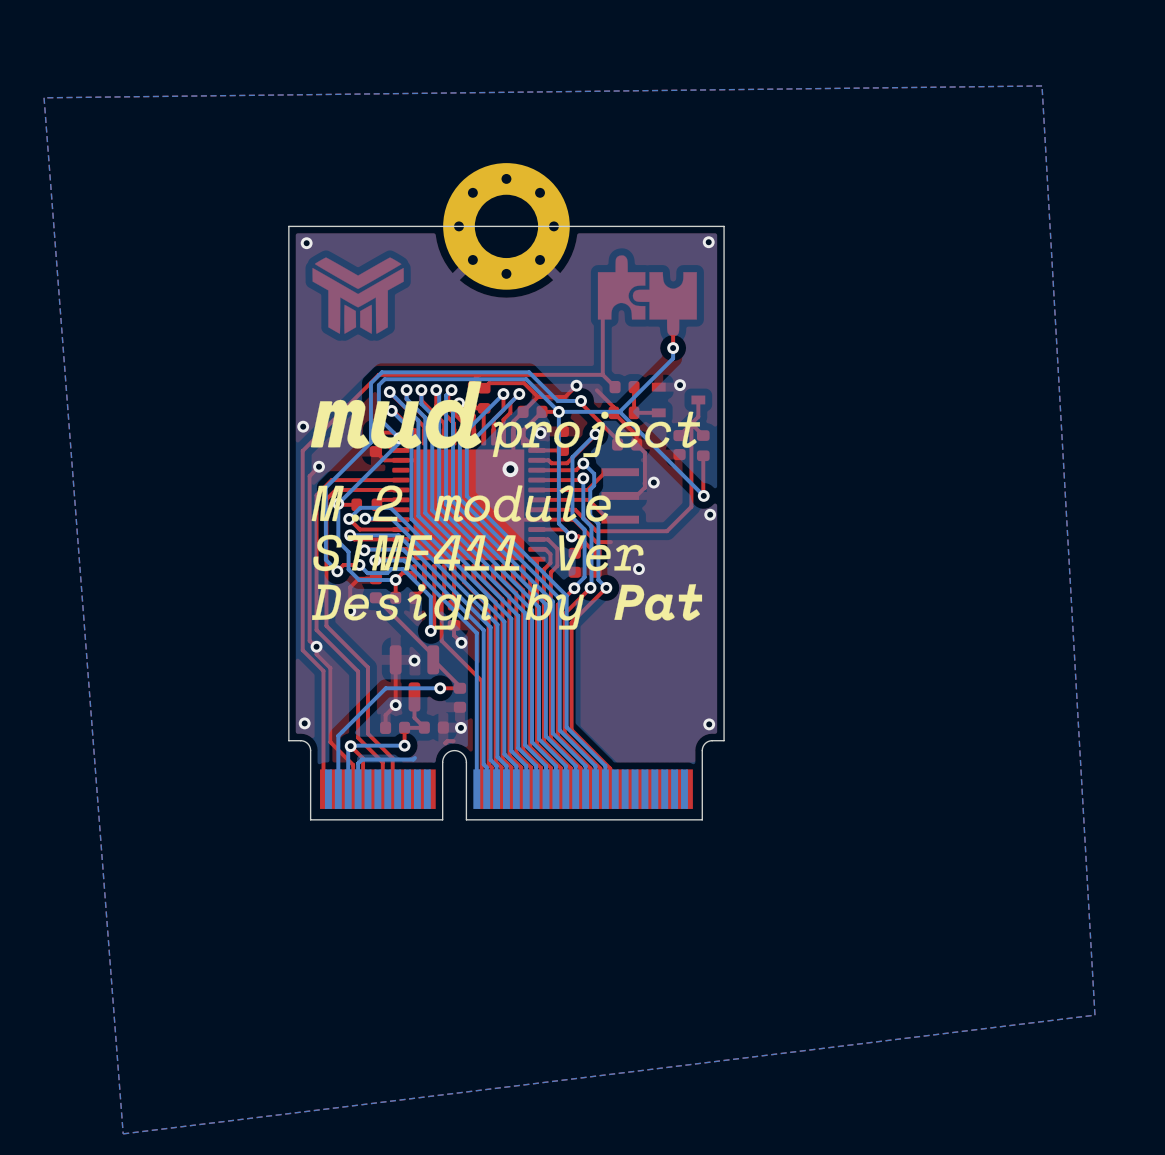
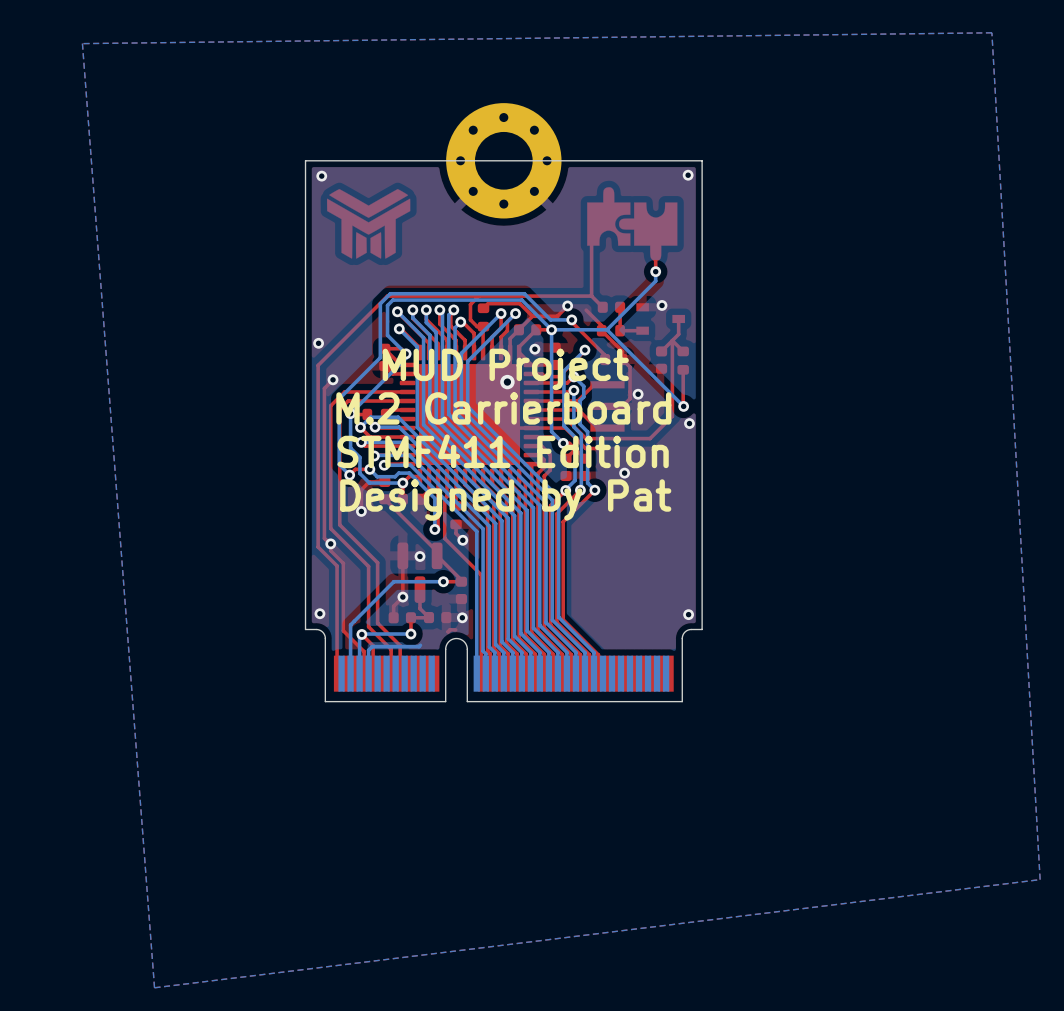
drawing: [310, 381, 703, 630] -> none
text: none -> MUD Project (505, 369)
text: none -> M.2 Carrierboard (503, 408)
text: none -> STMF411 Edition (503, 451)
text: none -> Designed by Pat (505, 500)

